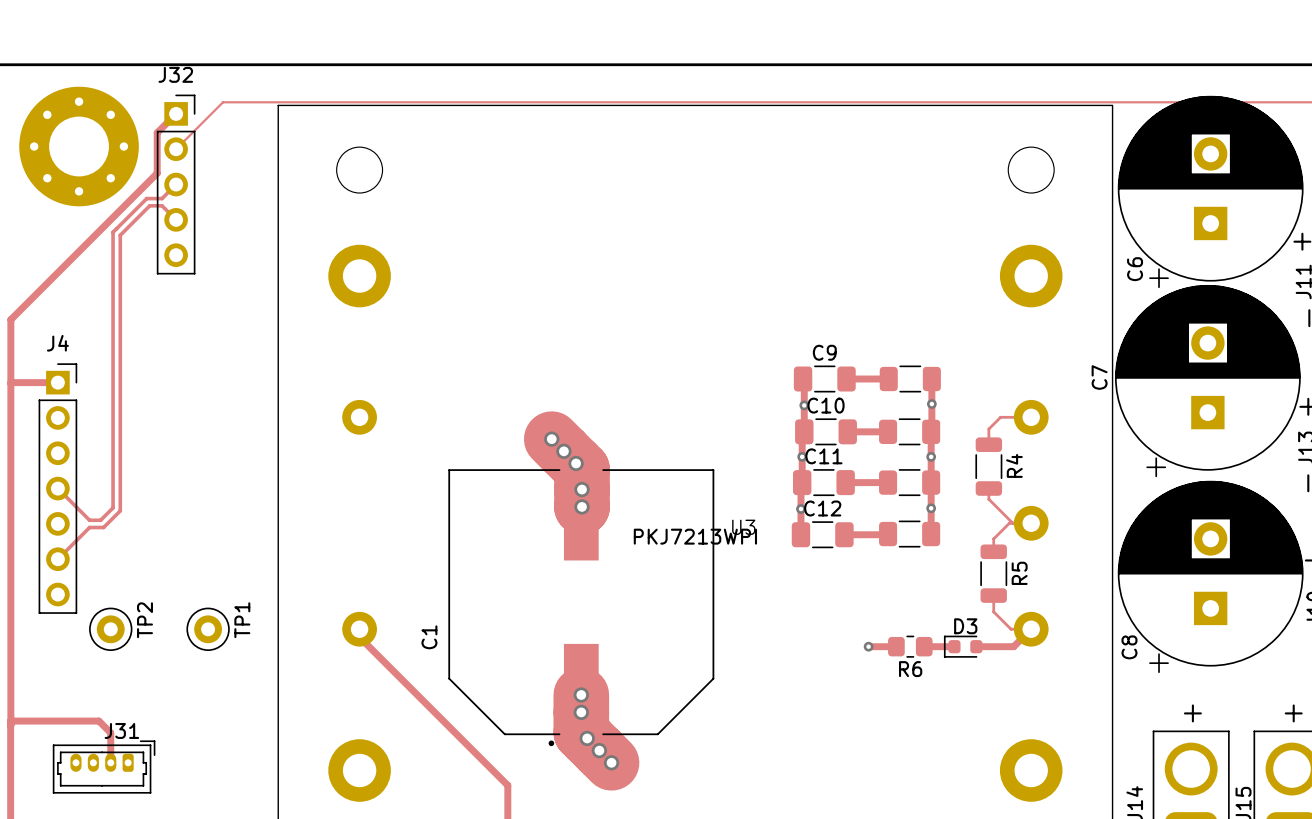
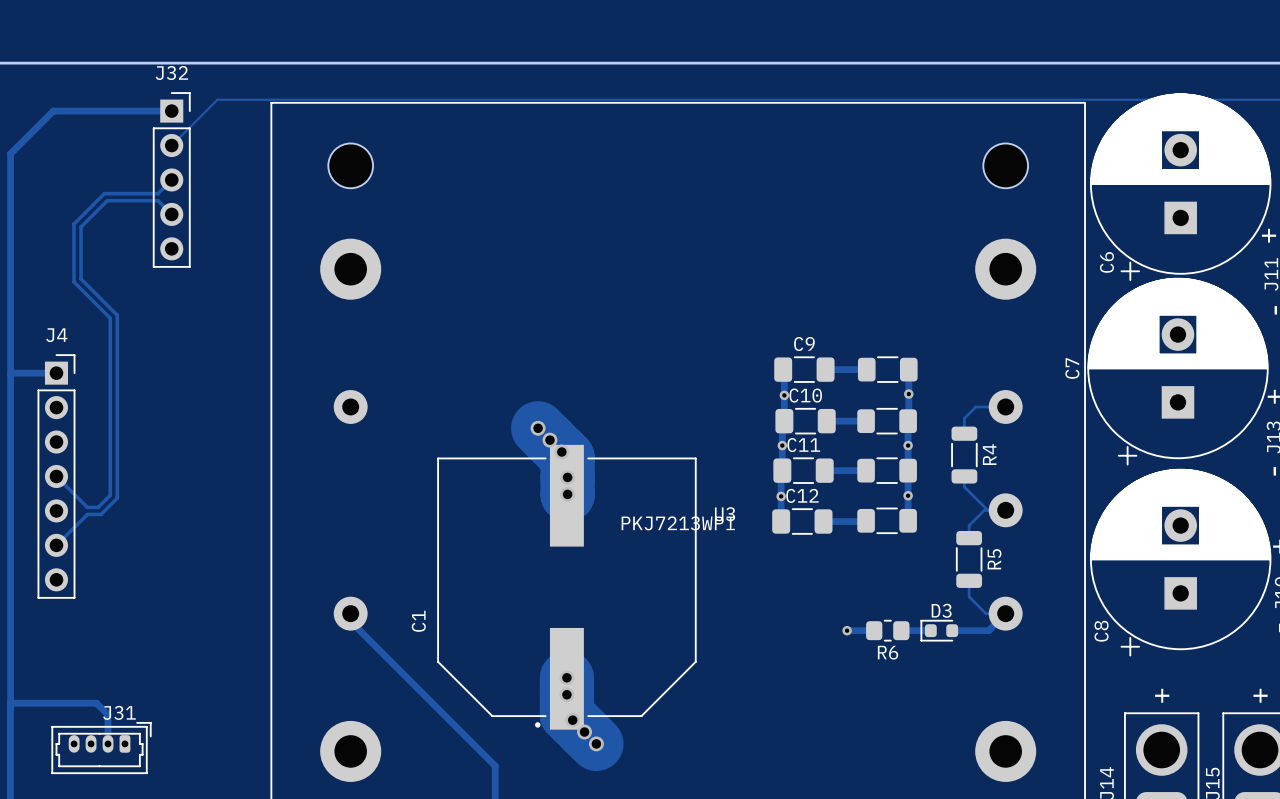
track: (176, 113) (157, 132) (157, 173) (10, 319) -> (171, 111) (53, 111) (10, 153) (10, 311)
part: (79, 146) -> none
track: (146, 198) (113, 232) (113, 326) -> (143, 193) (104, 193) (73, 224) (73, 281) (110, 318)
track: (149, 205) (120, 235) (120, 323) -> (146, 200) (107, 200) (81, 226) (81, 279) (117, 315)
TP2: (110, 629) -> none
TP1: (208, 629) -> none

